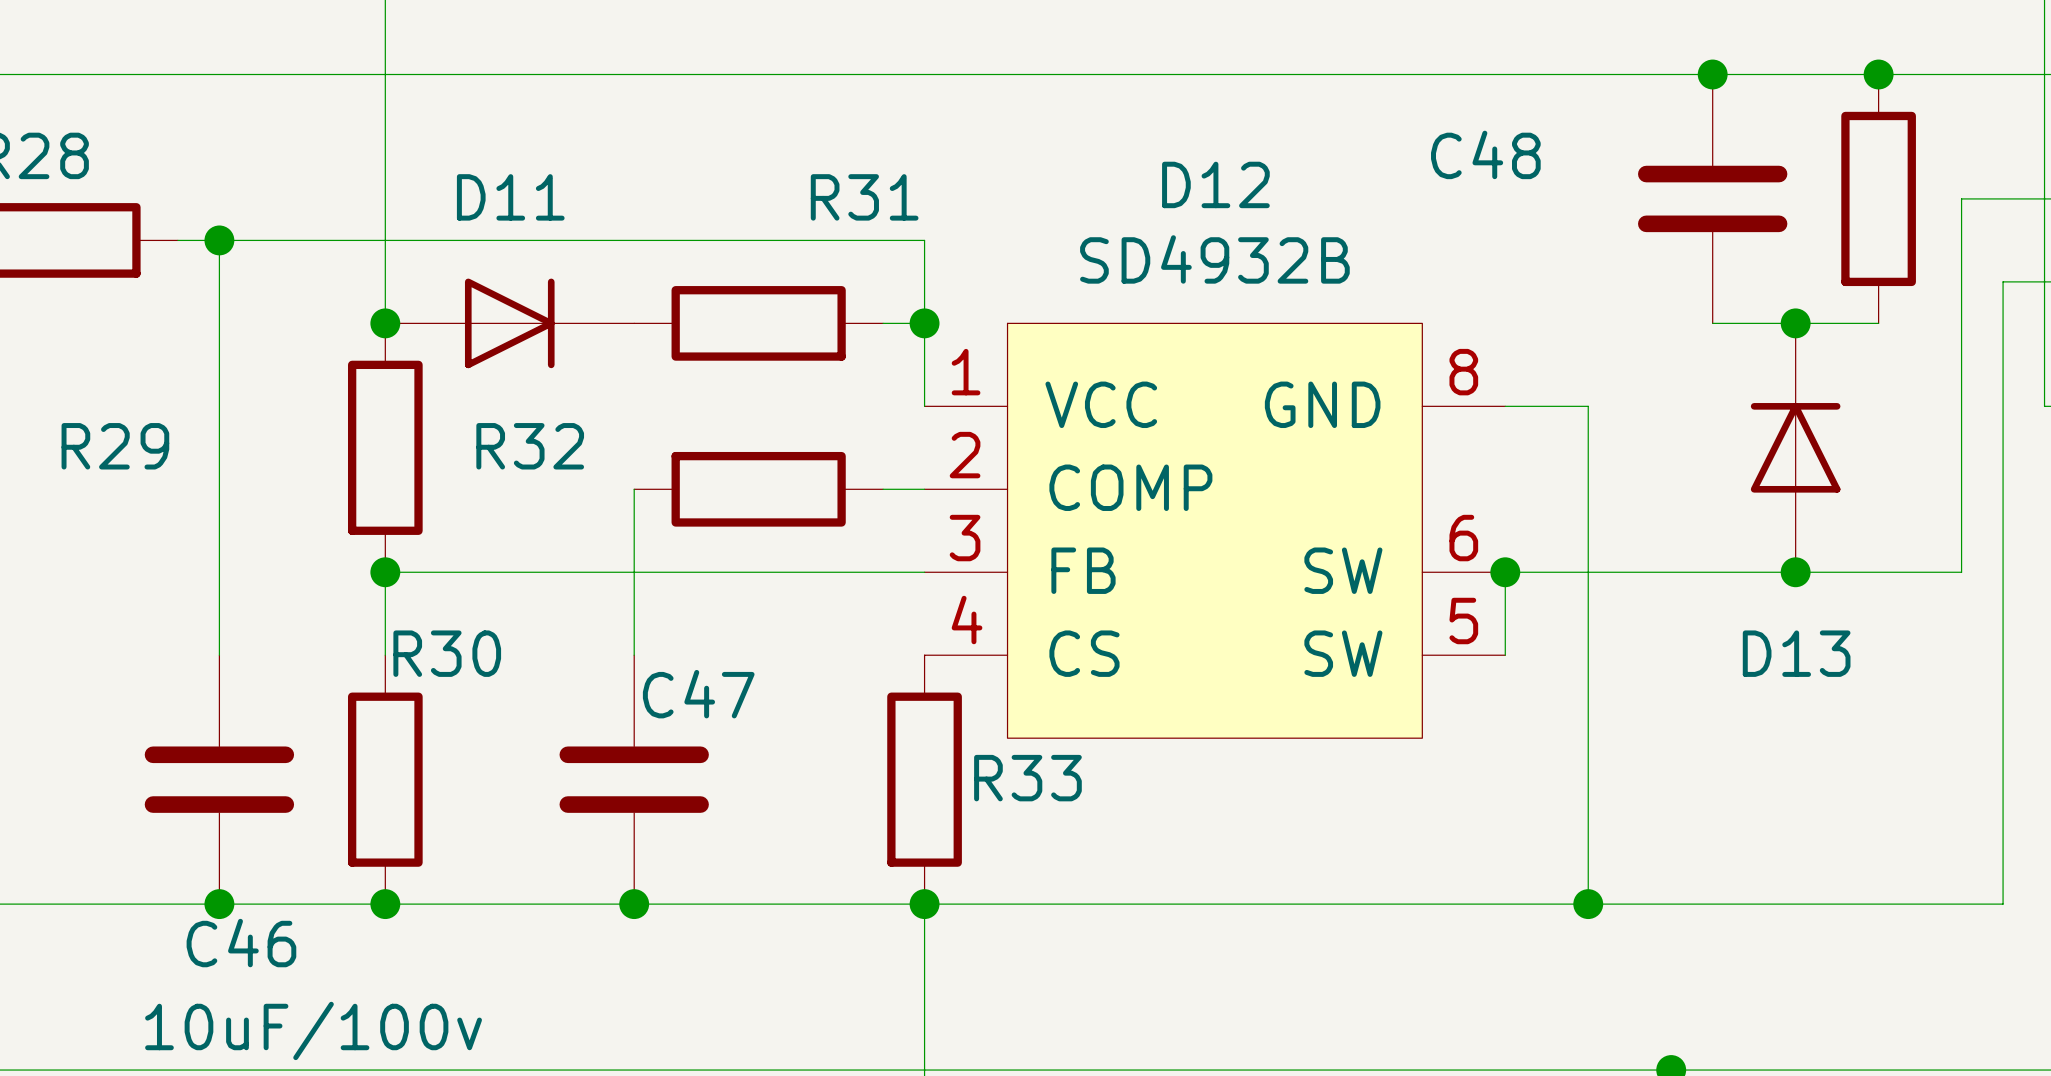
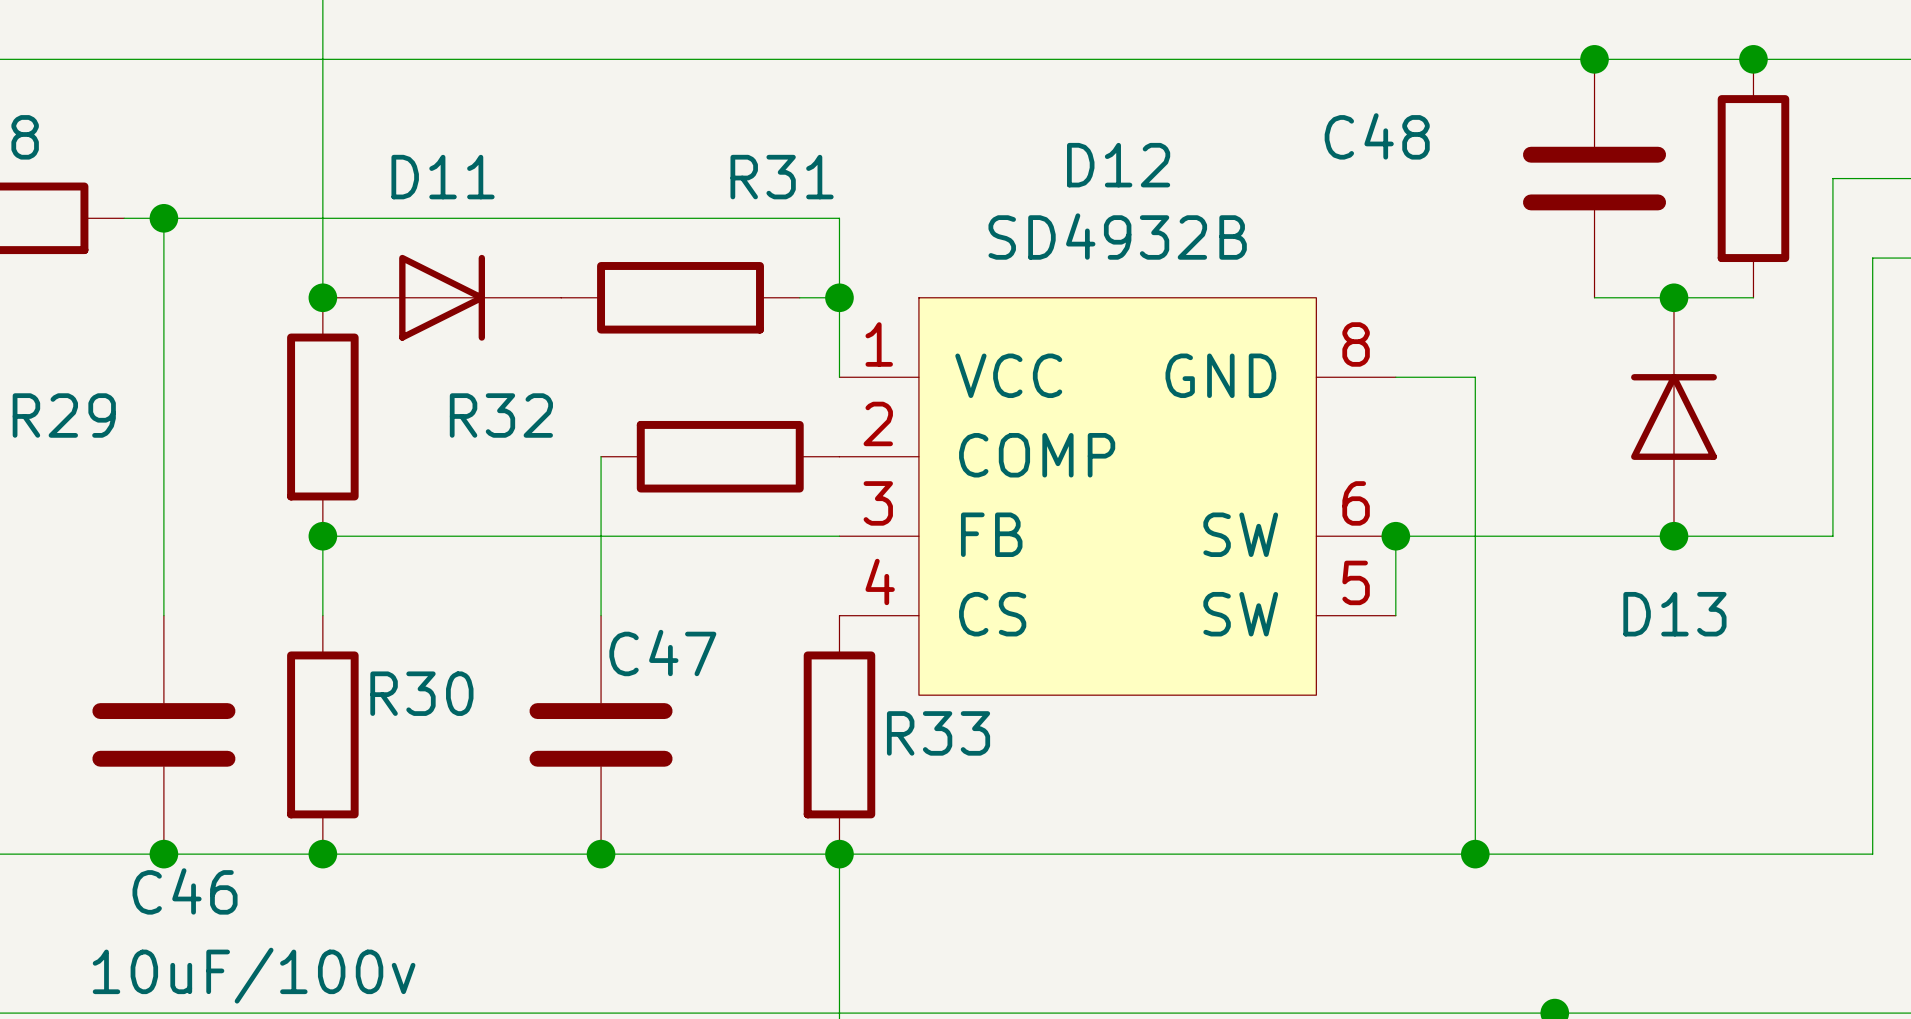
wire: (634, 489) (634, 655) -> (601, 456) (601, 615)
R32 position: (758, 489) -> (720, 456)
R30 name position: R30 (447, 653) -> R30 (421, 693)
C47 position: (634, 779) -> (601, 734)
junction position: (634, 904) -> (601, 854)

